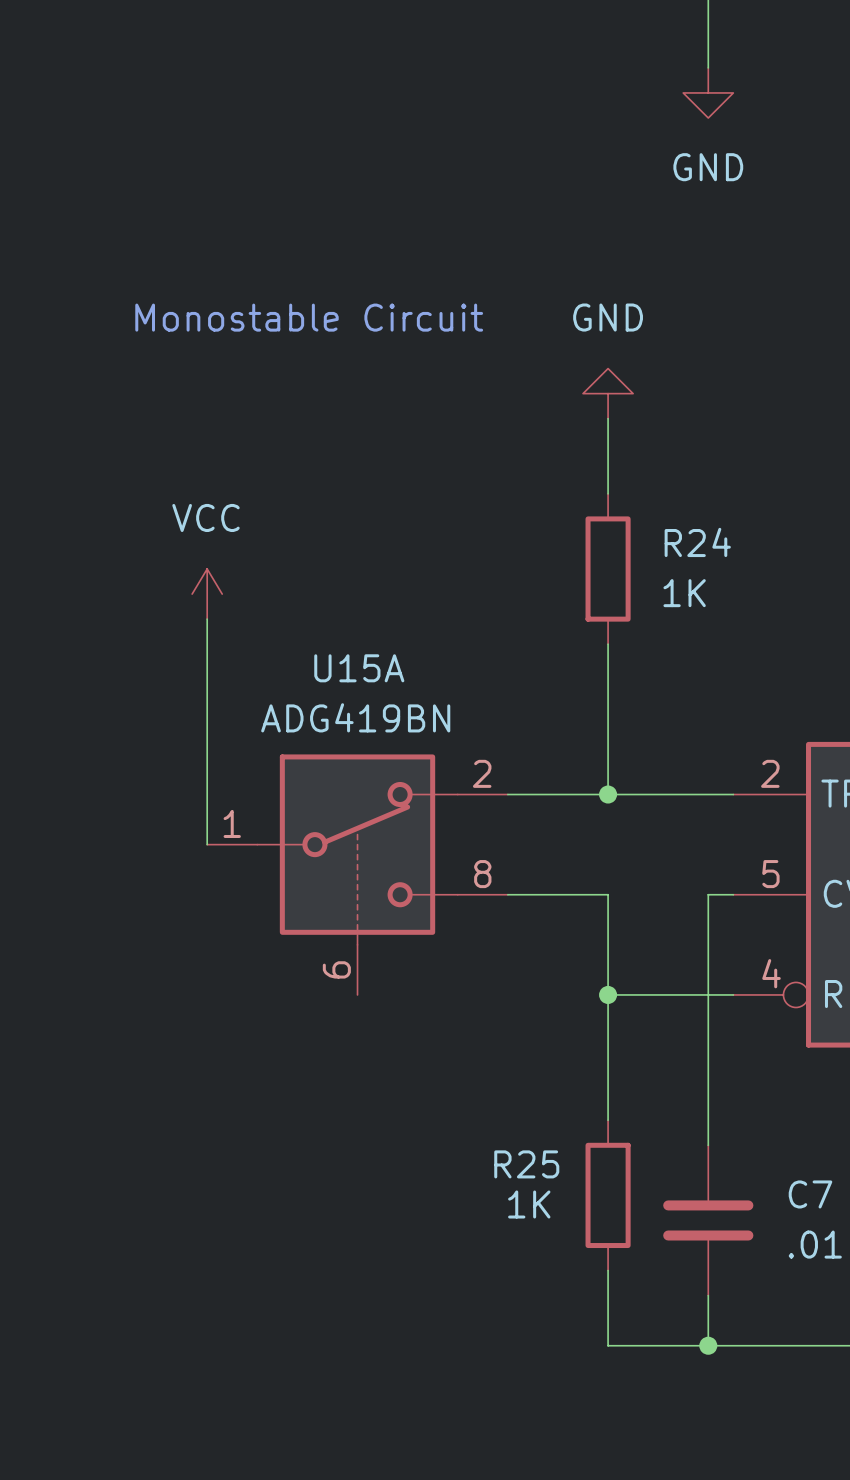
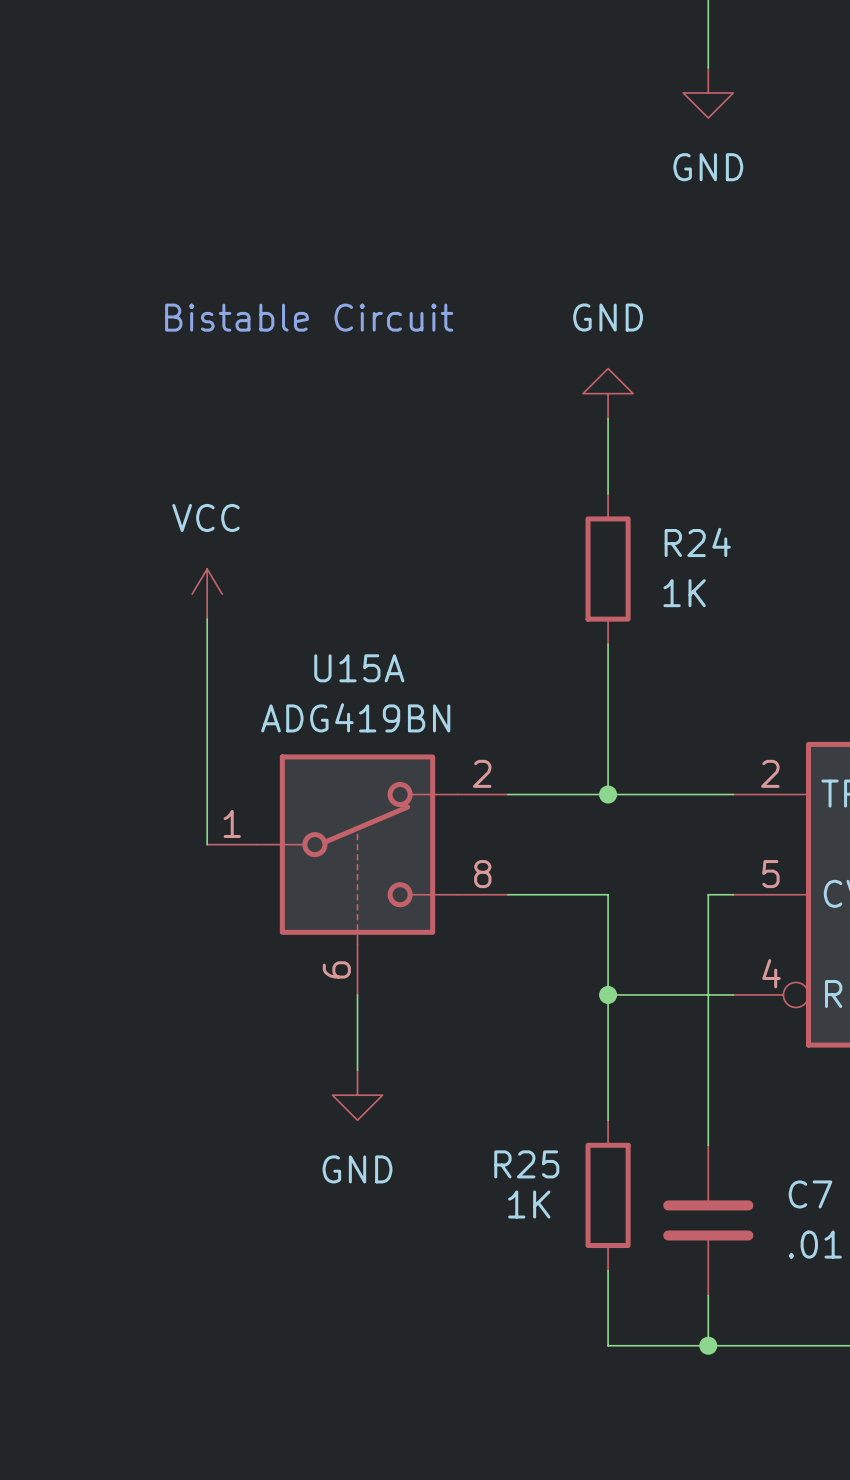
text: Monostable Circuit (309, 317) -> Bistable Circuit (309, 317)
wire: none -> (357, 994) (357, 1070)
power symbol: none -> GND (357, 1095)

